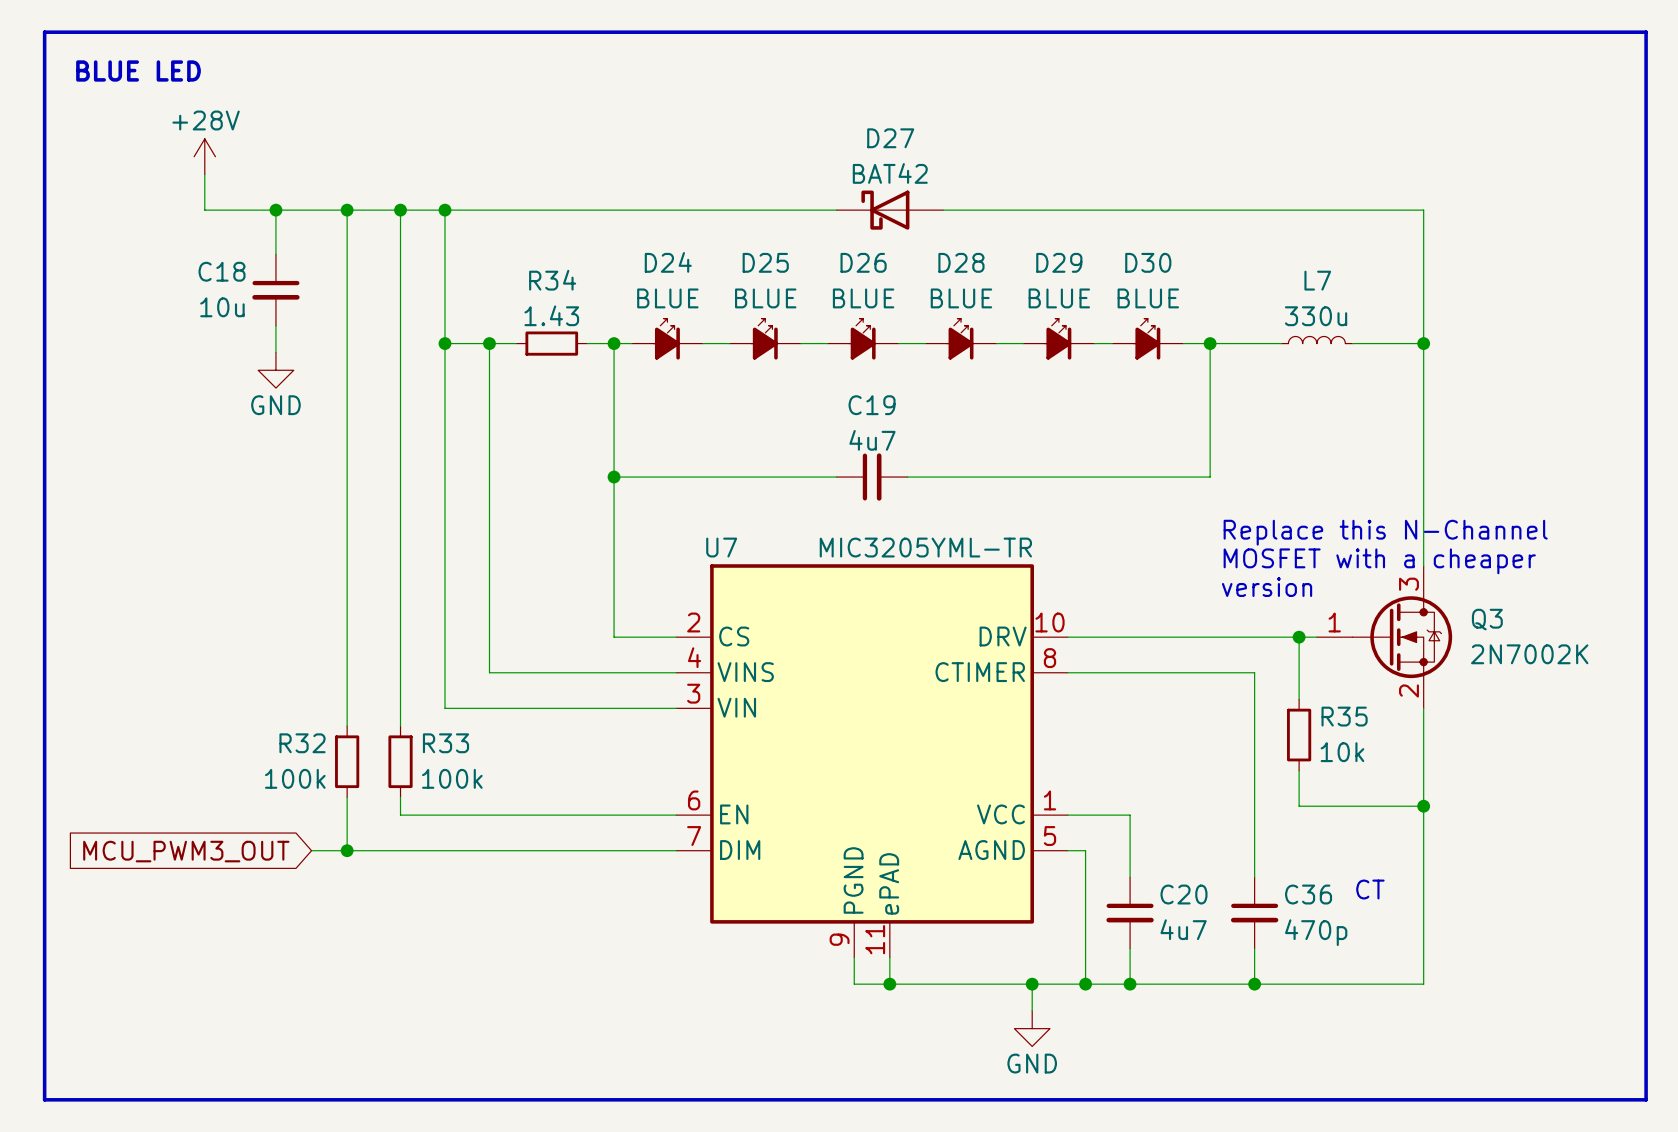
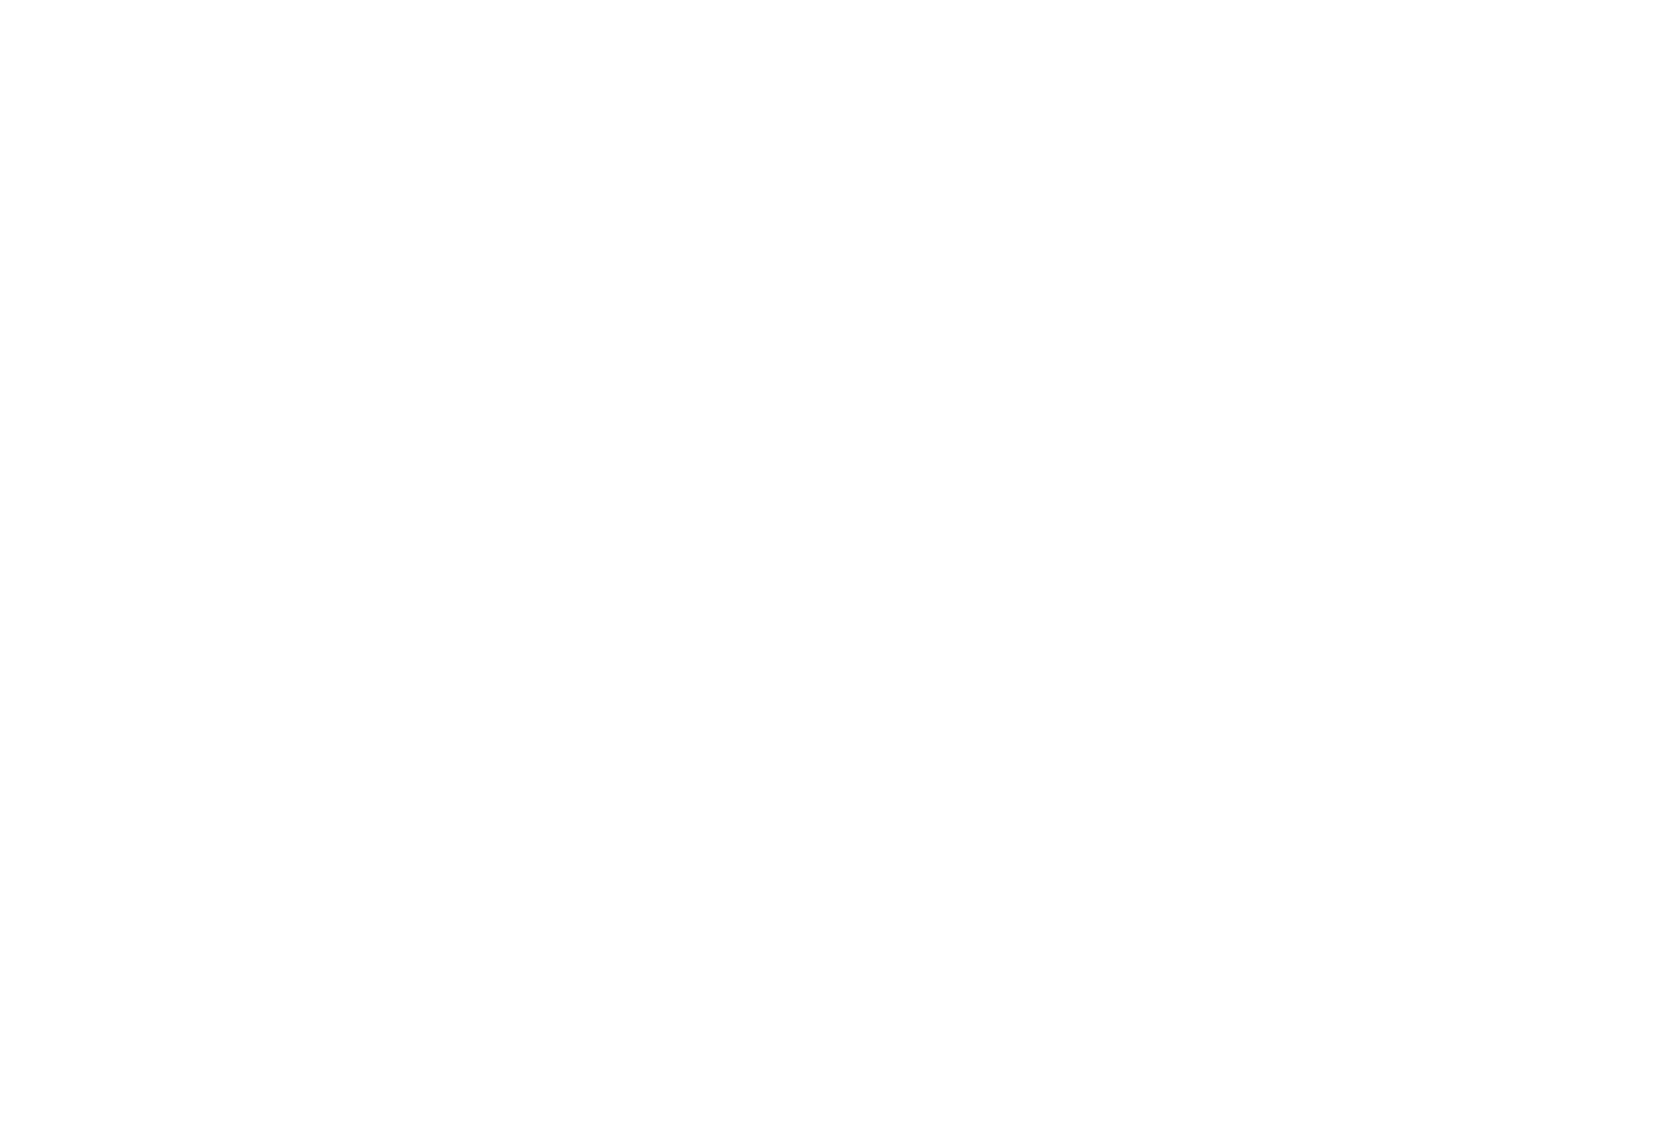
line: (44, 32) (1646, 32) (1646, 1099) (44, 1099) (44, 32) -> none
text: BLUE LED (138, 70) -> none
power symbol: +28V (204, 156) -> none
wire: (204, 174) (204, 210) (836, 210) -> none
wire: (275, 210) (275, 254) -> none
junction: (275, 210) -> none
wire: (347, 210) (347, 726) -> none
junction: (347, 210) -> none
wire: (400, 210) (400, 726) -> none
junction: (400, 210) -> none
wire: (445, 210) (445, 708) (676, 708) -> none
junction: (445, 210) -> none
D27: BAT42 (889, 210) -> none
wire: (943, 210) (1423, 210) (1423, 566) -> none
C18: 10u (275, 290) -> none
wire: (275, 325) (275, 352) -> none
D24: BLUE (667, 339) -> none
D25: BLUE (765, 339) -> none
D26: BLUE (863, 339) -> none
D28: BLUE (961, 339) -> none
D29: BLUE (1058, 339) -> none
D30: BLUE (1147, 339) -> none
L7: 330u (1316, 340) -> none
wire: (445, 343) (516, 343) -> none
junction: (445, 343) -> none
wire: (489, 343) (489, 672) (676, 672) -> none
junction: (489, 343) -> none
R34: 1.43 (551, 343) -> none
wire: (587, 343) (631, 343) -> none
wire: (614, 343) (614, 637) (676, 637) -> none
junction: (614, 343) -> none
wire: (703, 343) (729, 343) -> none
wire: (800, 343) (827, 343) -> none
wire: (898, 343) (925, 343) -> none
wire: (996, 343) (1023, 343) -> none
wire: (1094, 343) (1112, 343) -> none
wire: (1183, 343) (1281, 343) -> none
wire: (1210, 343) (1210, 477) (907, 477) -> none
junction: (1210, 343) -> none
wire: (1352, 343) (1423, 343) -> none
junction: (1423, 343) -> none
power symbol: GND (275, 370) -> none
wire: (614, 477) (836, 477) -> none
junction: (614, 477) -> none
C19: 4u7 (872, 477) -> none
text: Replace this N-Channel (1385, 532) -> none
text: MOSFET with a cheaper (1379, 561) -> none
text: version (1267, 587) -> none
wire: (1067, 637) (1316, 637) -> none
wire: (1299, 637) (1299, 699) -> none
junction: (1299, 637) -> none
Q3: 2N7002K (1384, 637) -> none
wire: (1067, 672) (1254, 672) (1254, 877) -> none
wire: (1423, 708) (1423, 984) (854, 984) (854, 957) -> none
R35: 10k (1299, 735) -> none
U7: MIC3205YML-TR (872, 760) -> none
R32: 100k (347, 761) -> none
R33: 100k (400, 761) -> none
wire: (1299, 770) (1299, 806) (1423, 806) -> none
wire: (347, 797) (347, 850) -> none
wire: (400, 797) (400, 815) (676, 815) -> none
junction: (1423, 806) -> none
wire: (1067, 815) (1130, 815) (1130, 877) -> none
wire: (311, 850) (676, 850) -> none
junction: (347, 850) -> none
wire: (1067, 850) (1085, 850) (1085, 984) -> none
global label: MCU_PWM3_OUT (186, 851) -> none
text: CT (1370, 889) -> none
C20: 4u7 (1130, 912) -> none
C36: 470p (1254, 912) -> none
wire: (1130, 948) (1130, 984) -> none
wire: (1254, 948) (1254, 984) -> none
wire: (889, 957) (889, 984) -> none
junction: (889, 984) -> none
wire: (1032, 984) (1032, 1010) -> none
junction: (1032, 984) -> none
junction: (1085, 984) -> none
junction: (1130, 984) -> none
junction: (1254, 984) -> none
power symbol: GND (1032, 1028) -> none

